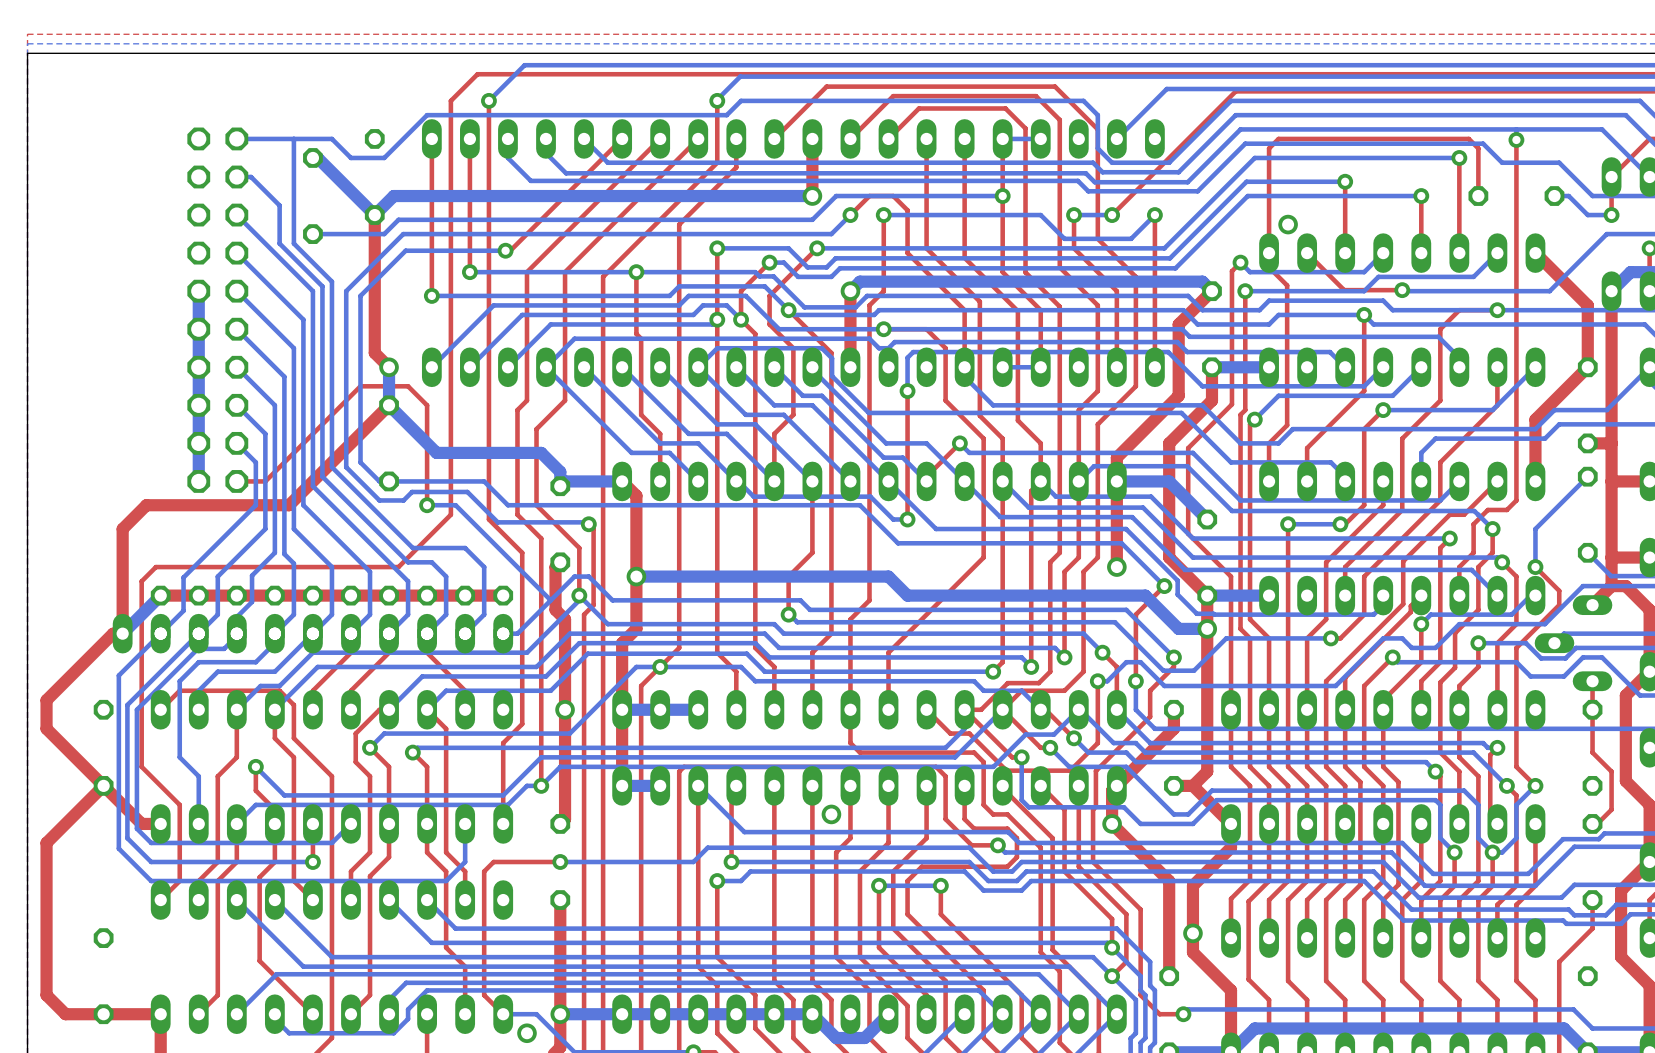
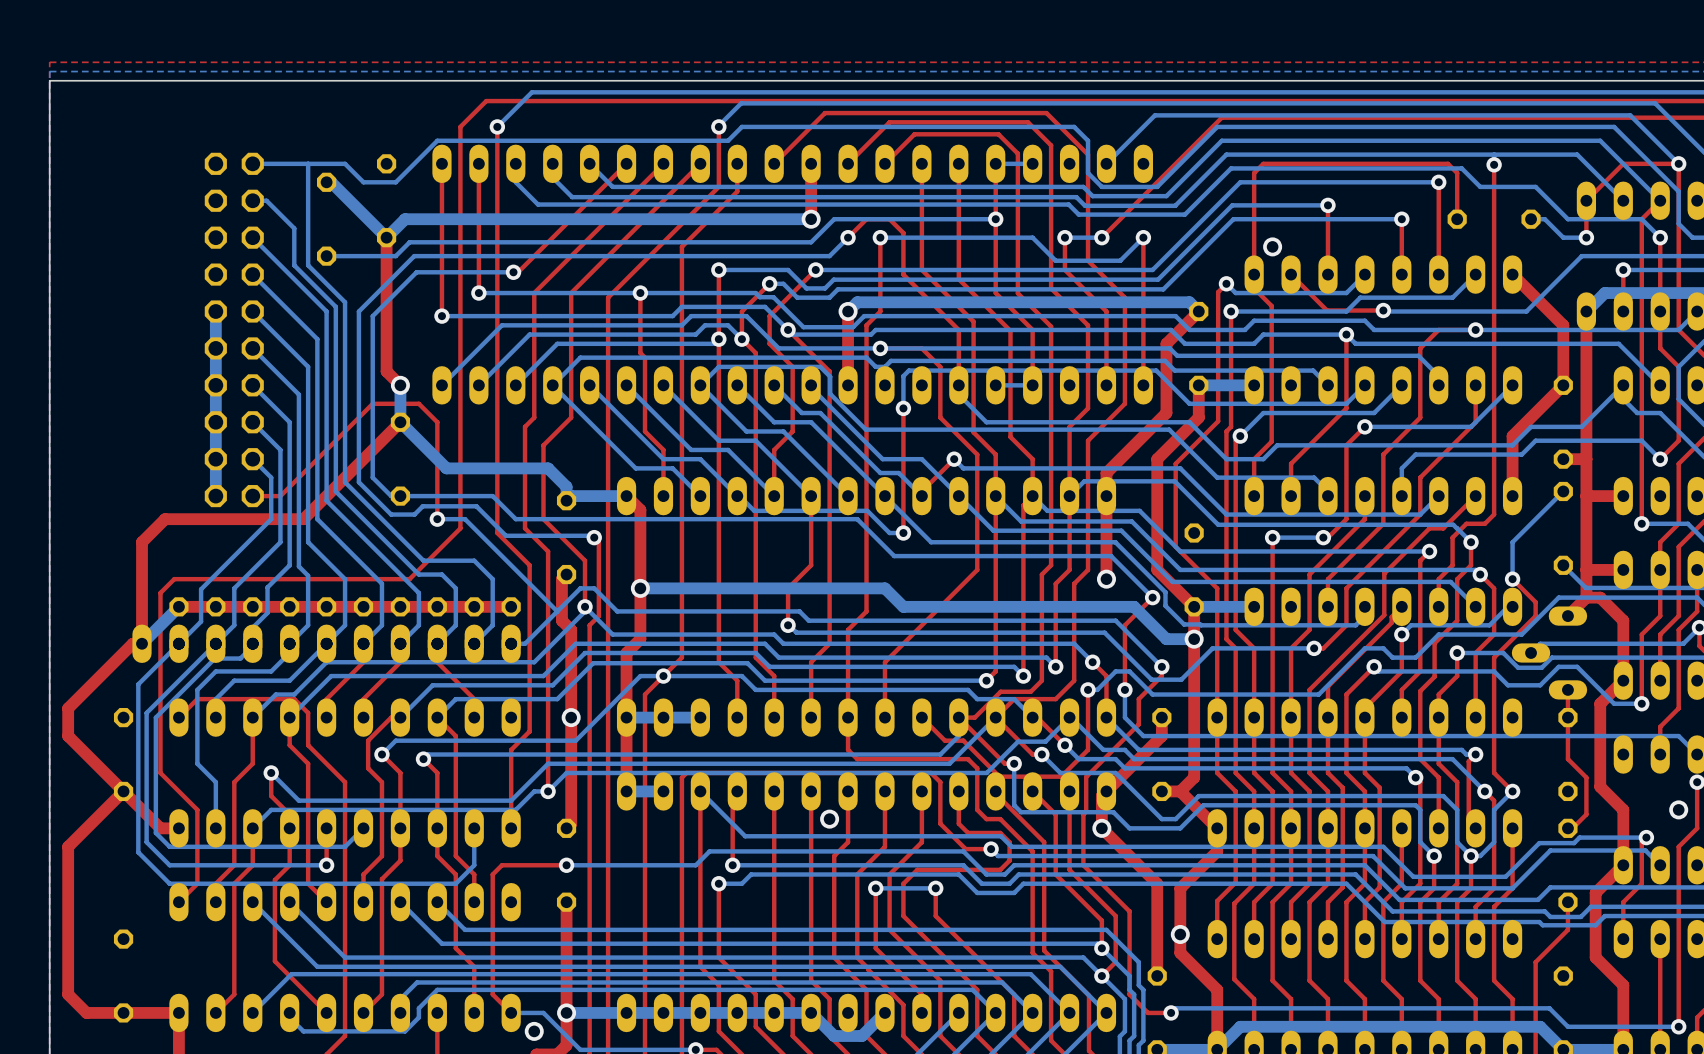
bottom track: (1116, 481) (1169, 481) (1207, 519) -> none

